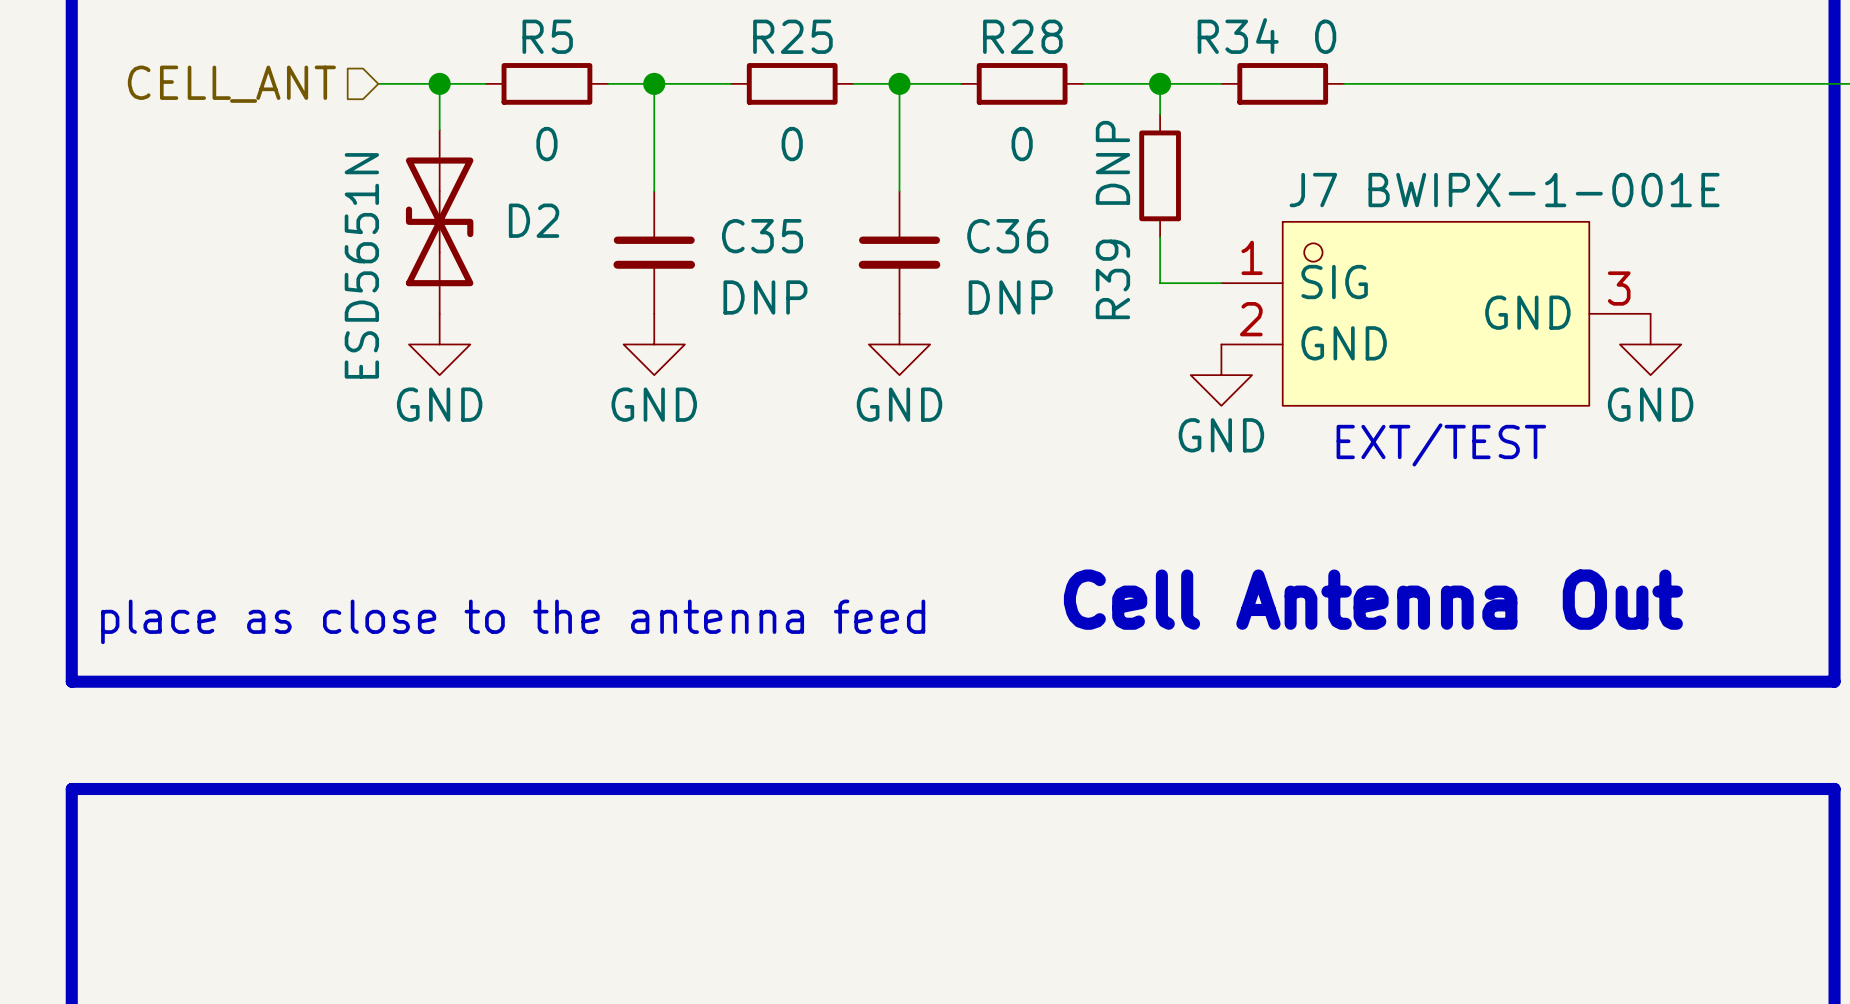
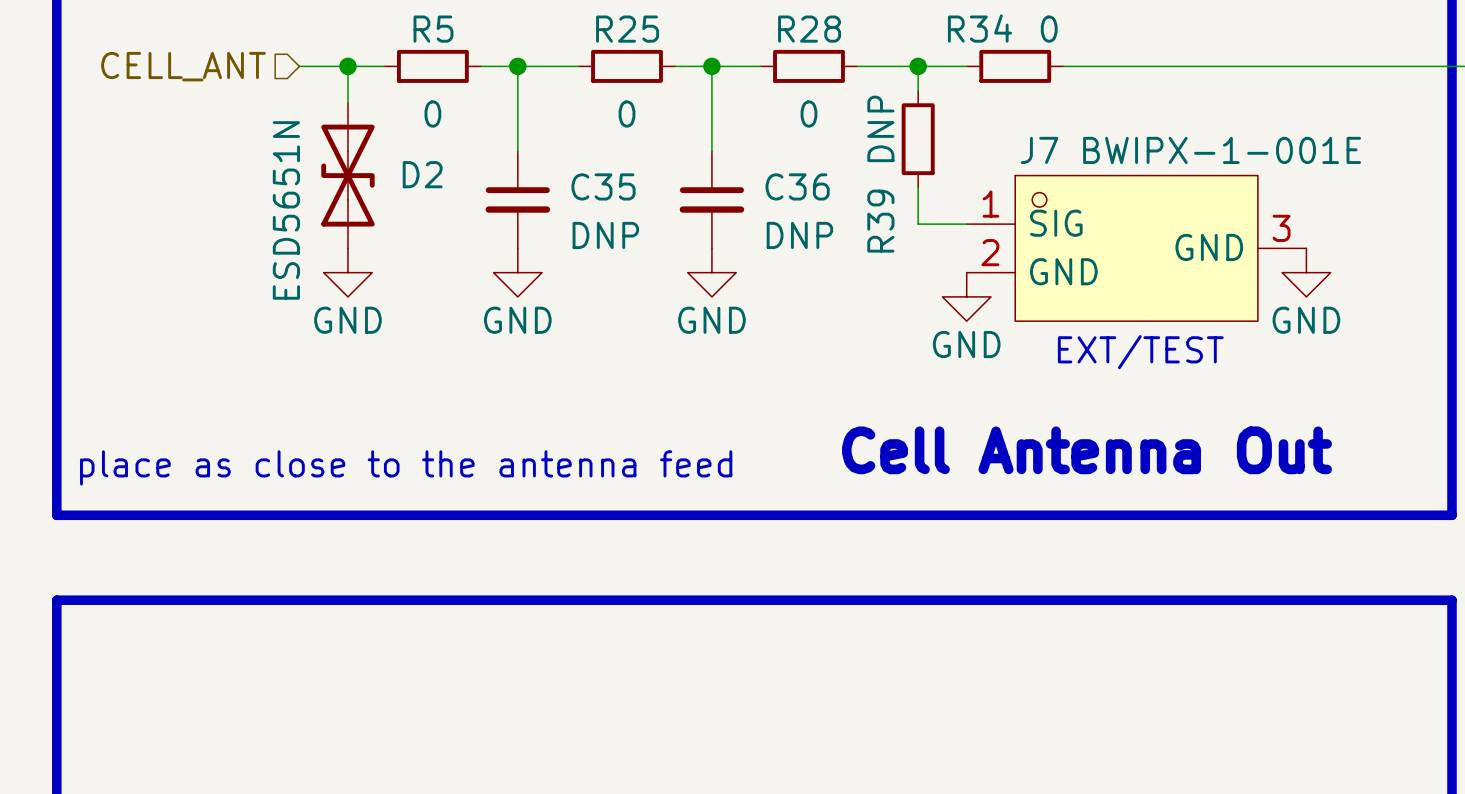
text position: Cell Antenna Out (1373, 599) -> Cell Antenna Out (1087, 450)
text position: place as close to the antenna feed (513, 621) -> place as close to the antenna feed (406, 467)
line: (71, 651) (71, 681) (1834, 681) (1834, 651) -> (56, 515) (1451, 515)
line: (71, 789) (1834, 789) -> (56, 624) (56, 600) (1451, 600) (1451, 624)

